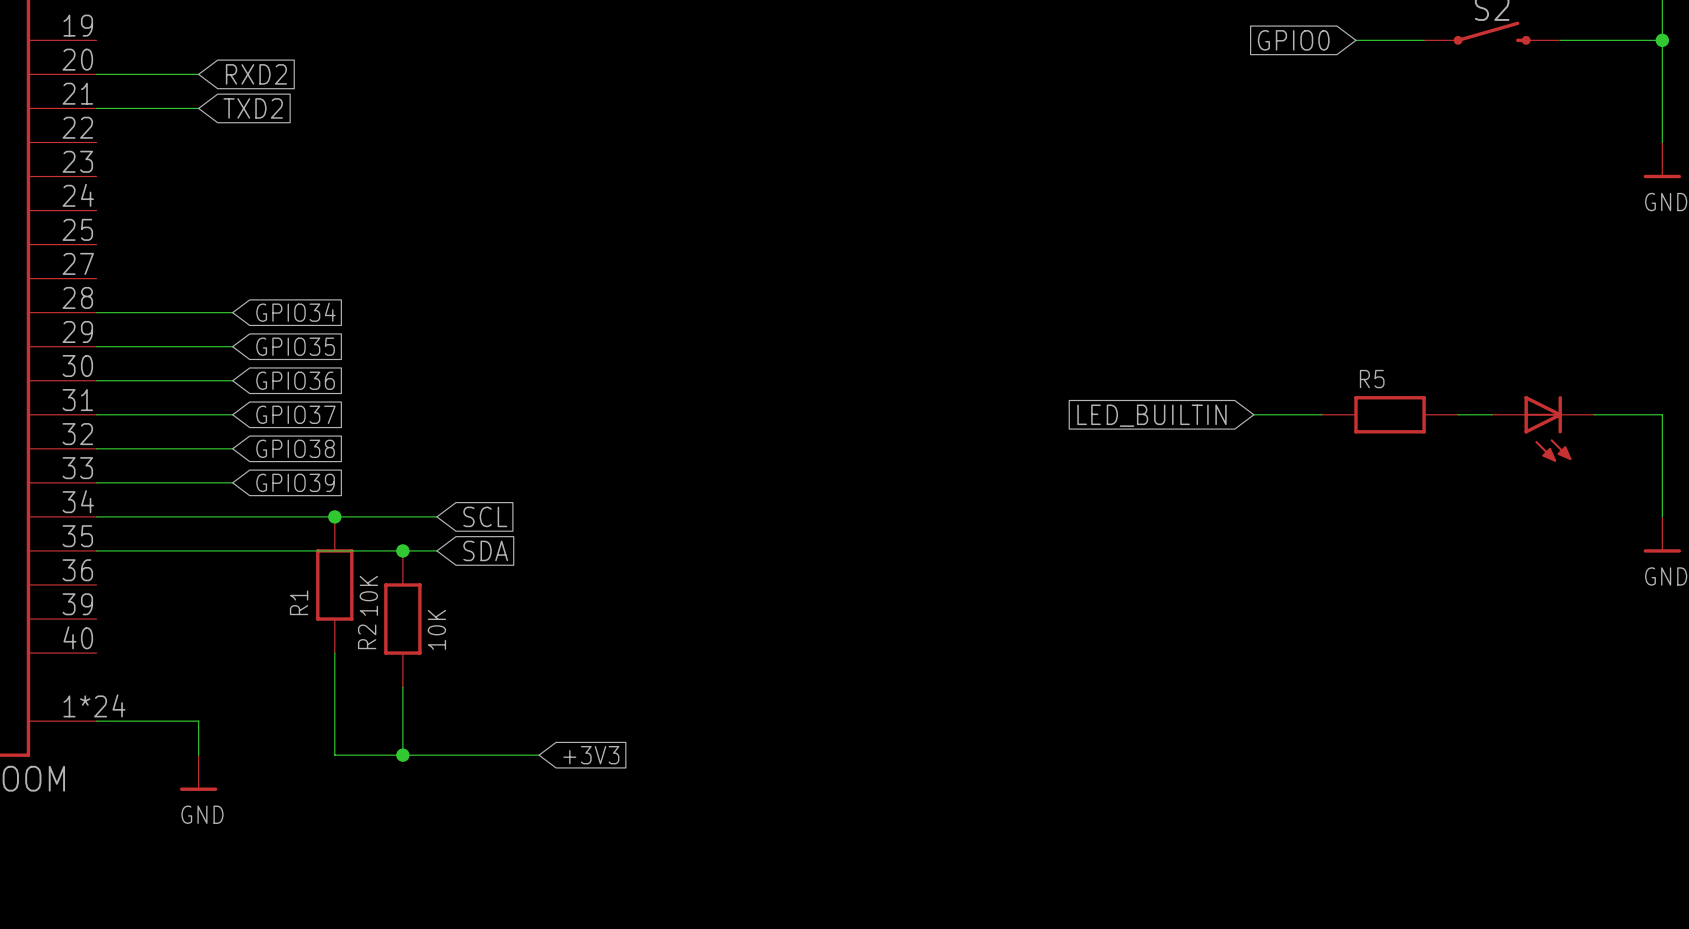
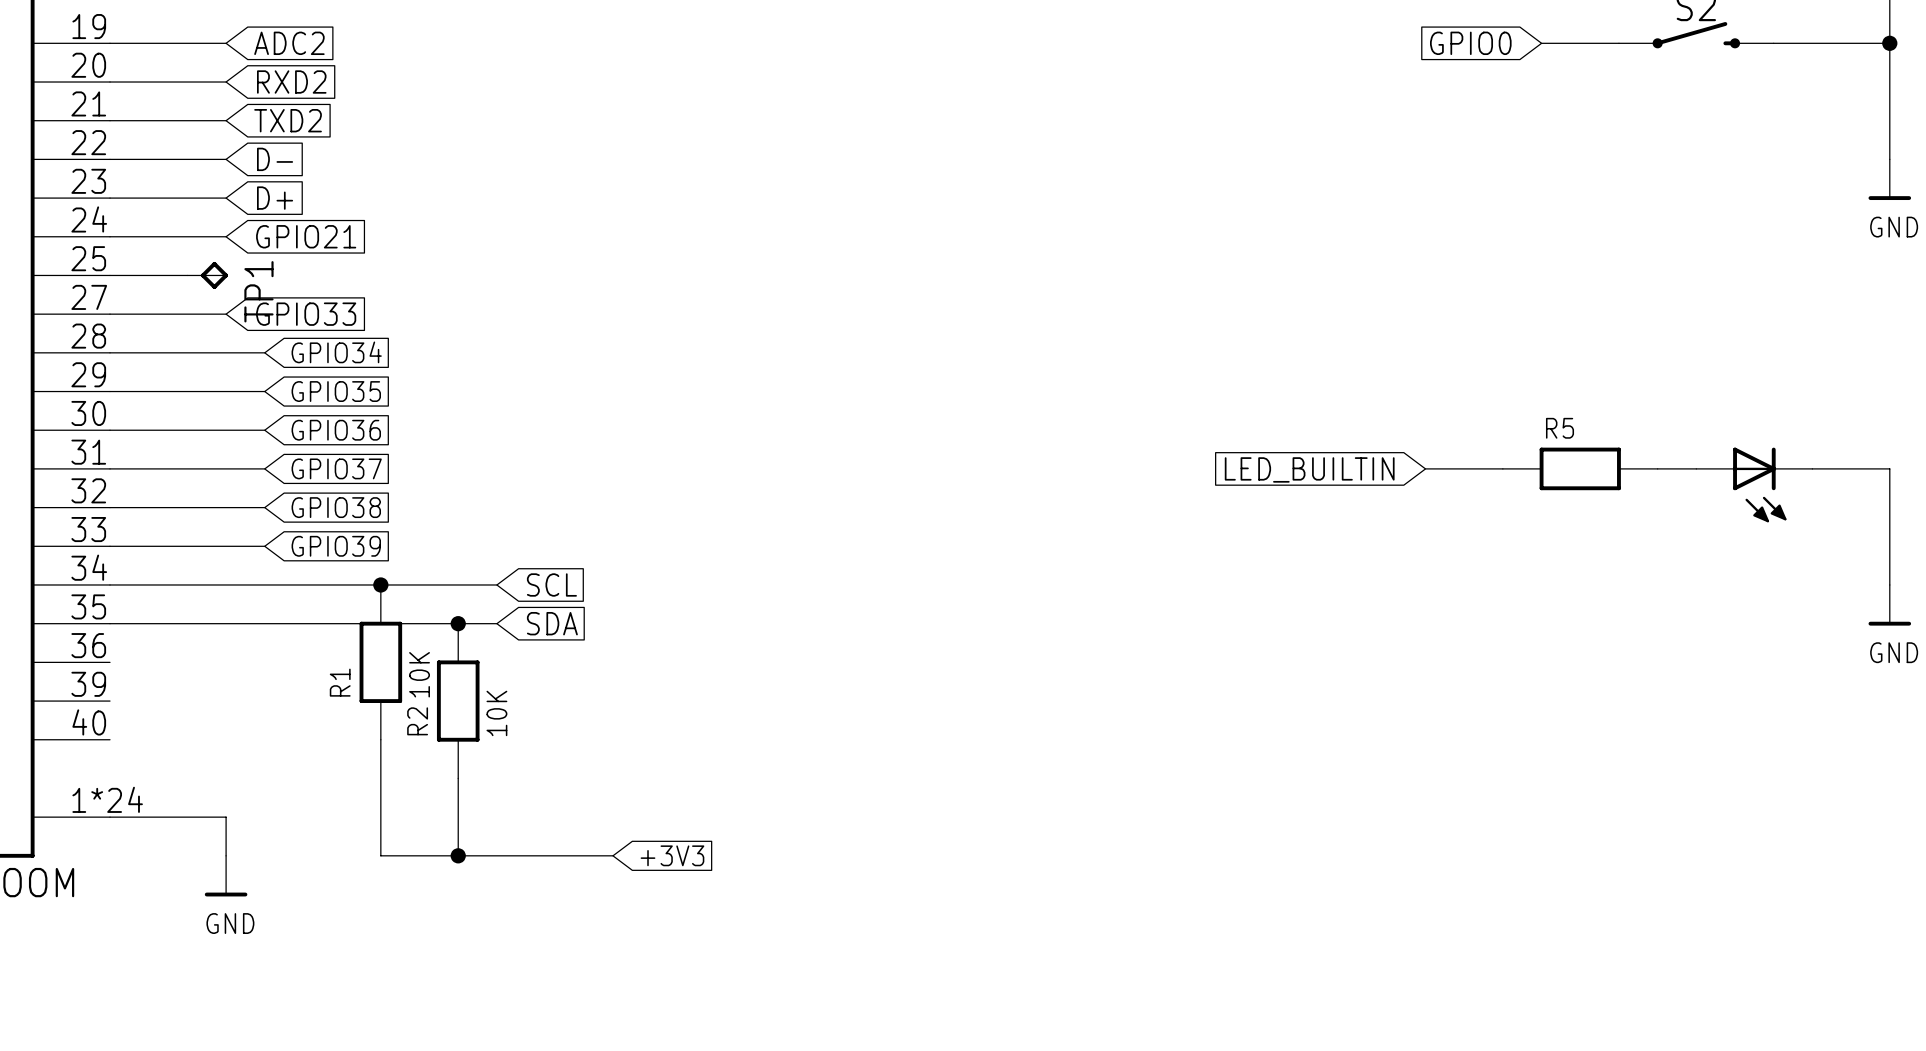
wire: none -> (110, 43) (226, 43)
global label: none -> ADC2 (289, 43)
wire: none -> (110, 159) (226, 159)
global label: none -> D- (275, 159)
wire: none -> (110, 198) (226, 198)
global label: none -> D+ (275, 198)
wire: none -> (110, 236) (226, 236)
global label: none -> GPIO21 (306, 236)
wire: none -> (110, 275) (187, 275)
TP1: none -> (207, 275)
wire: none -> (110, 314) (226, 314)
global label: none -> GPIO33 (306, 314)

